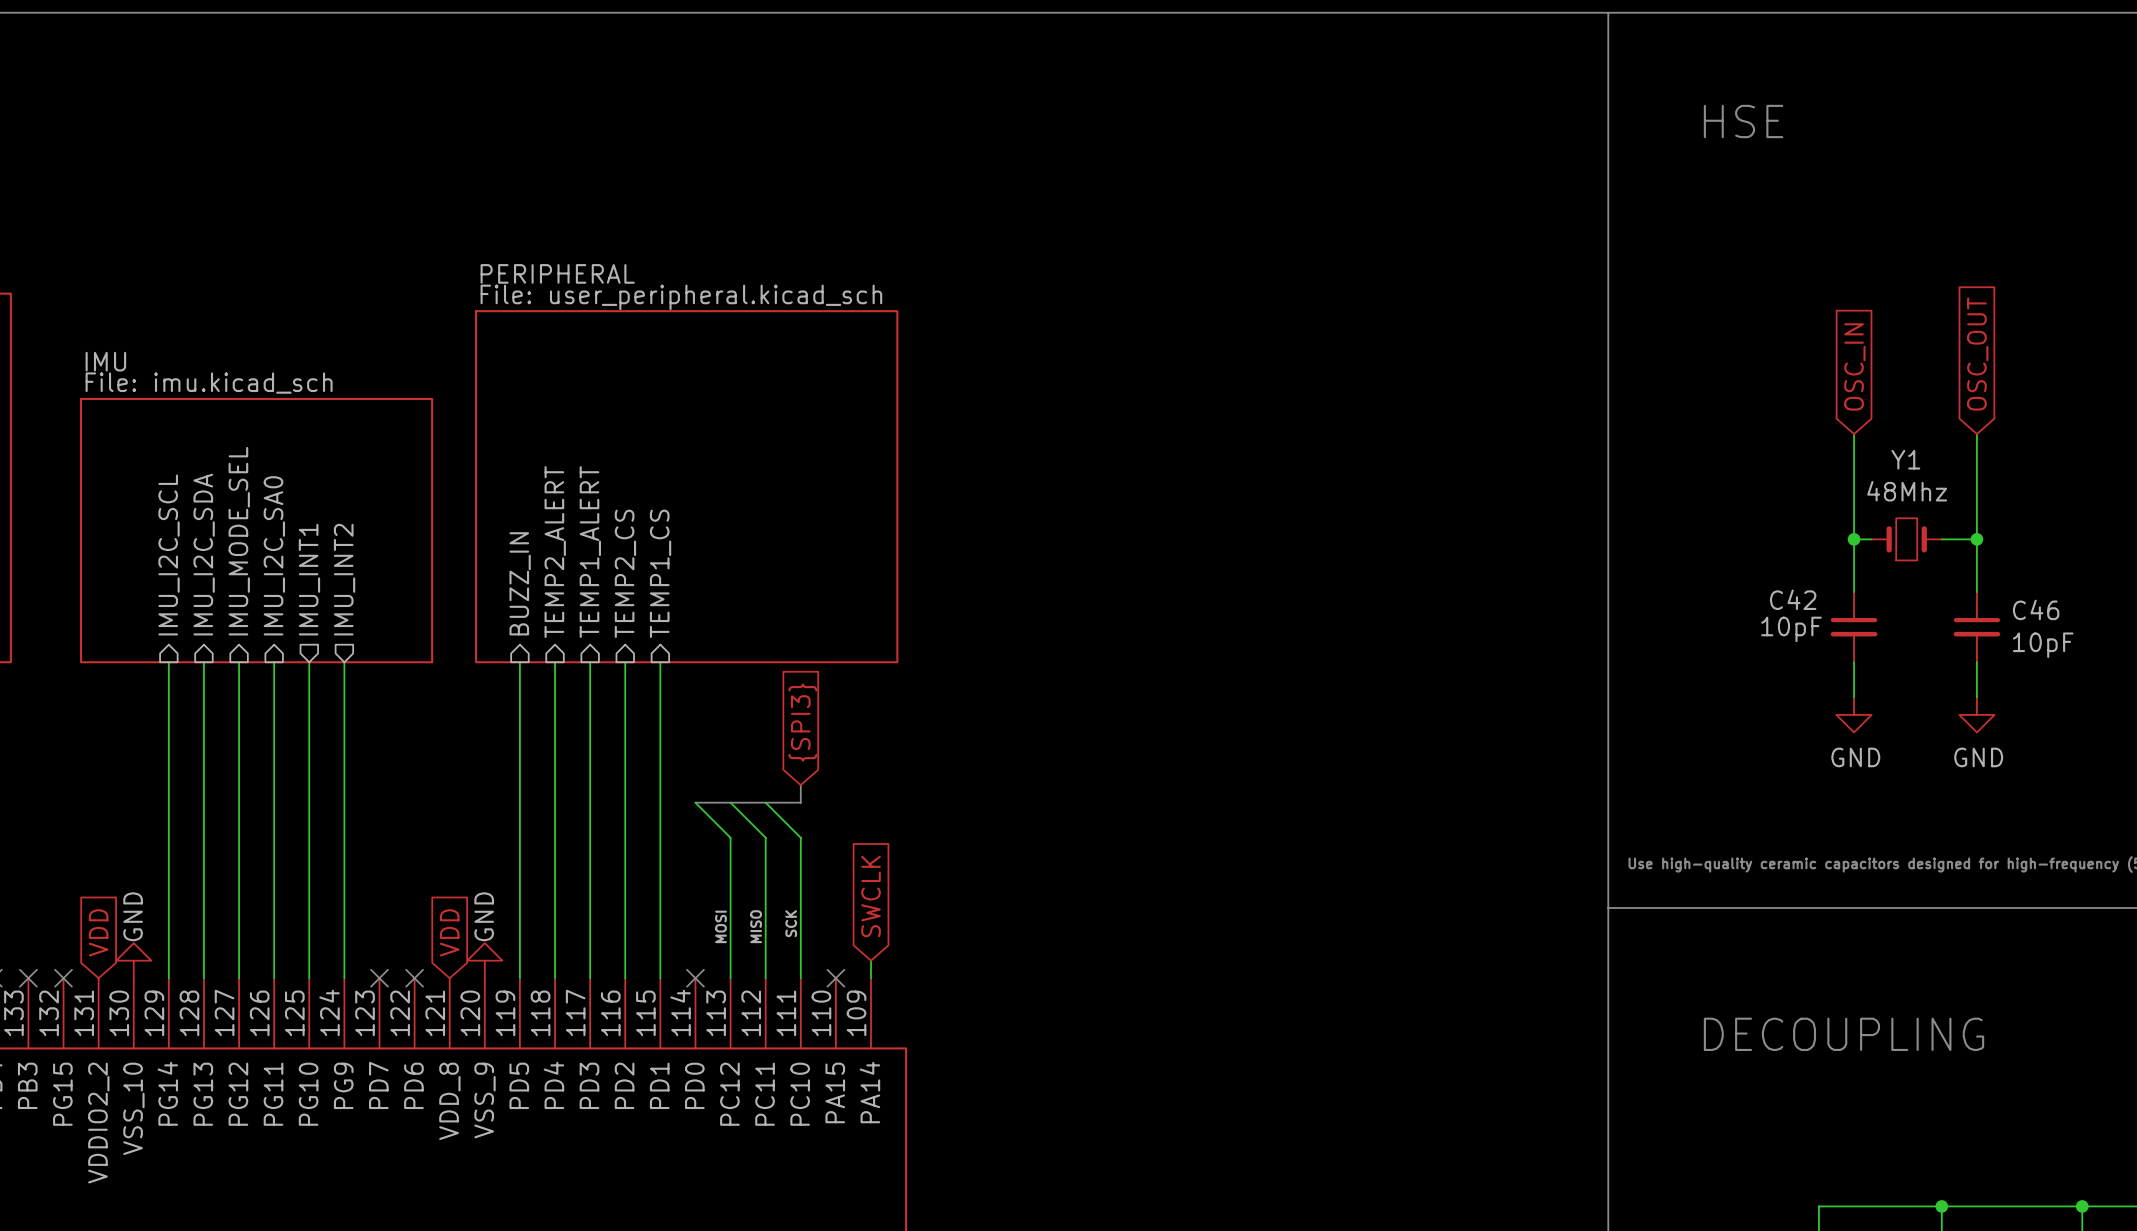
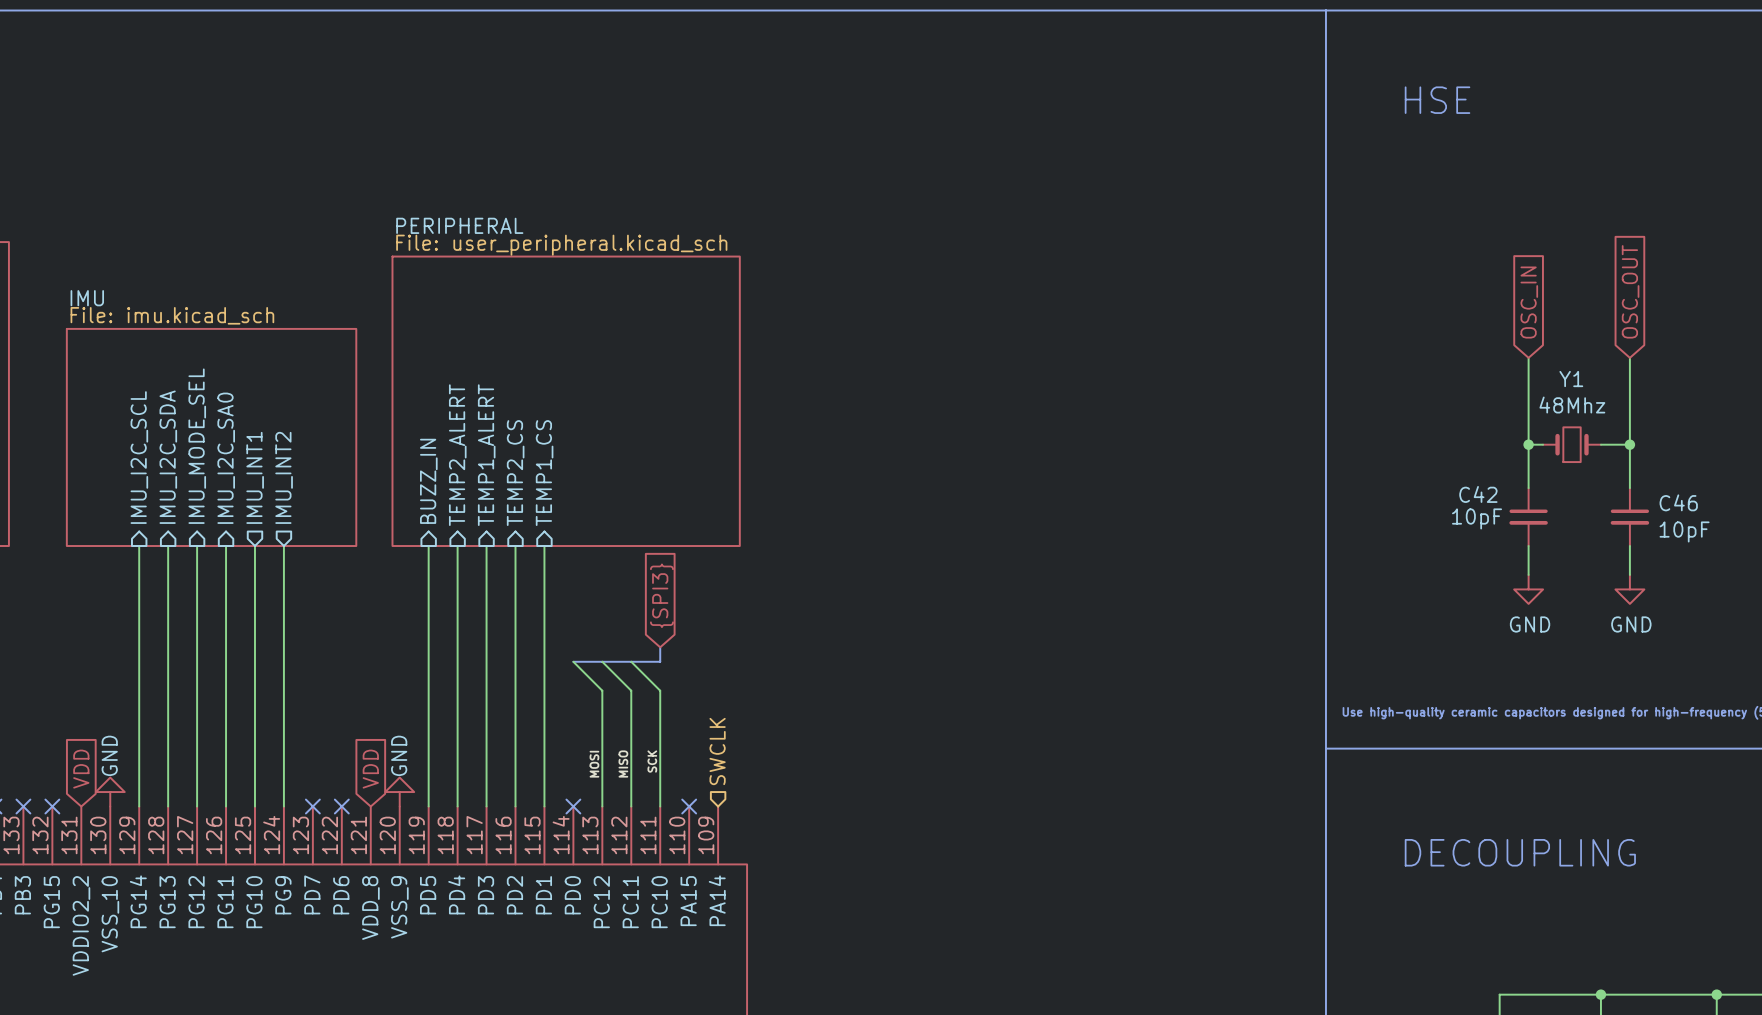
global label: SWCLK (871, 896) -> none
hierarchical label: none -> SWCLK (717, 751)
wire: (871, 960) (871, 978) -> none

